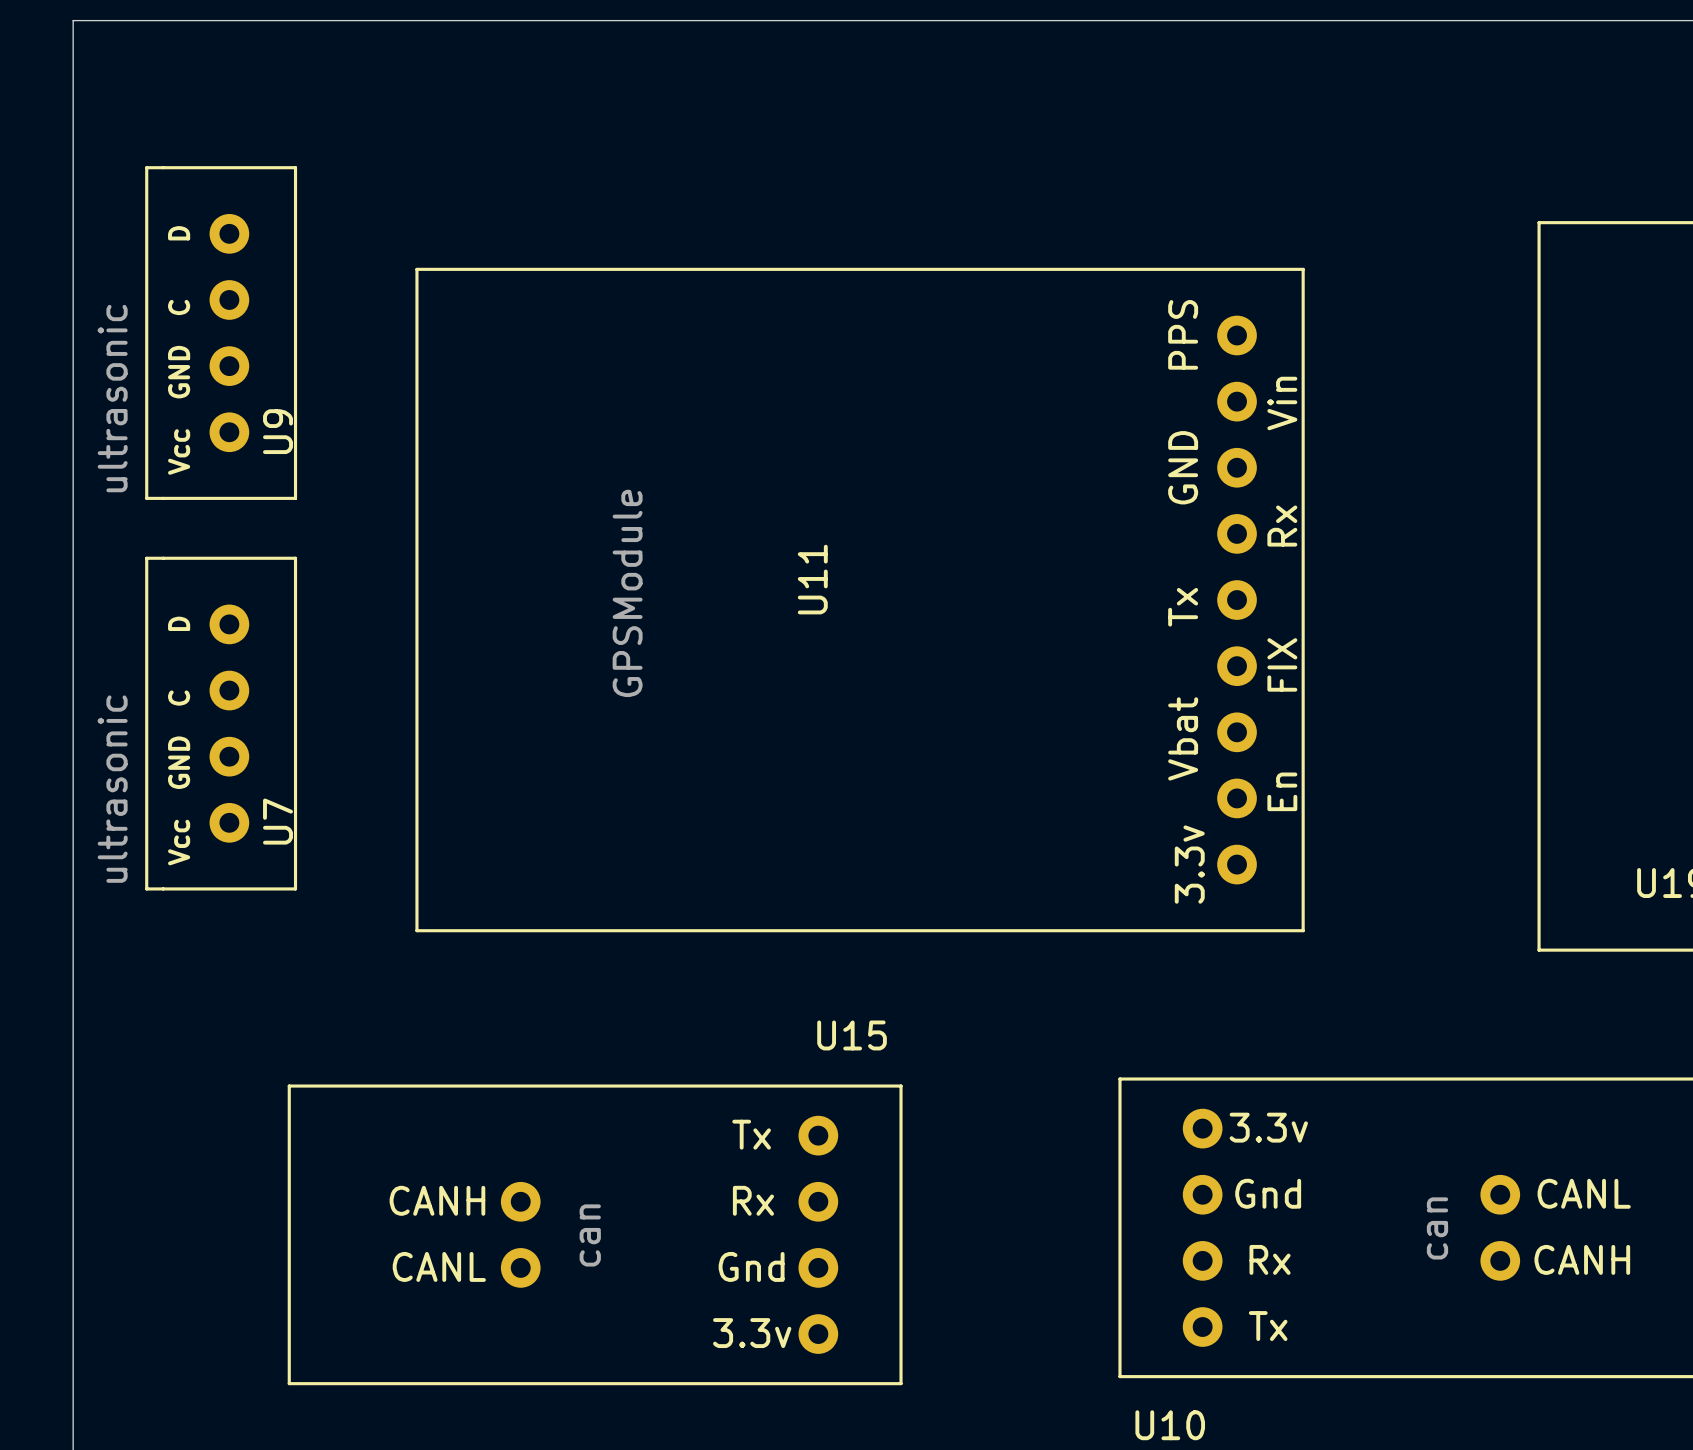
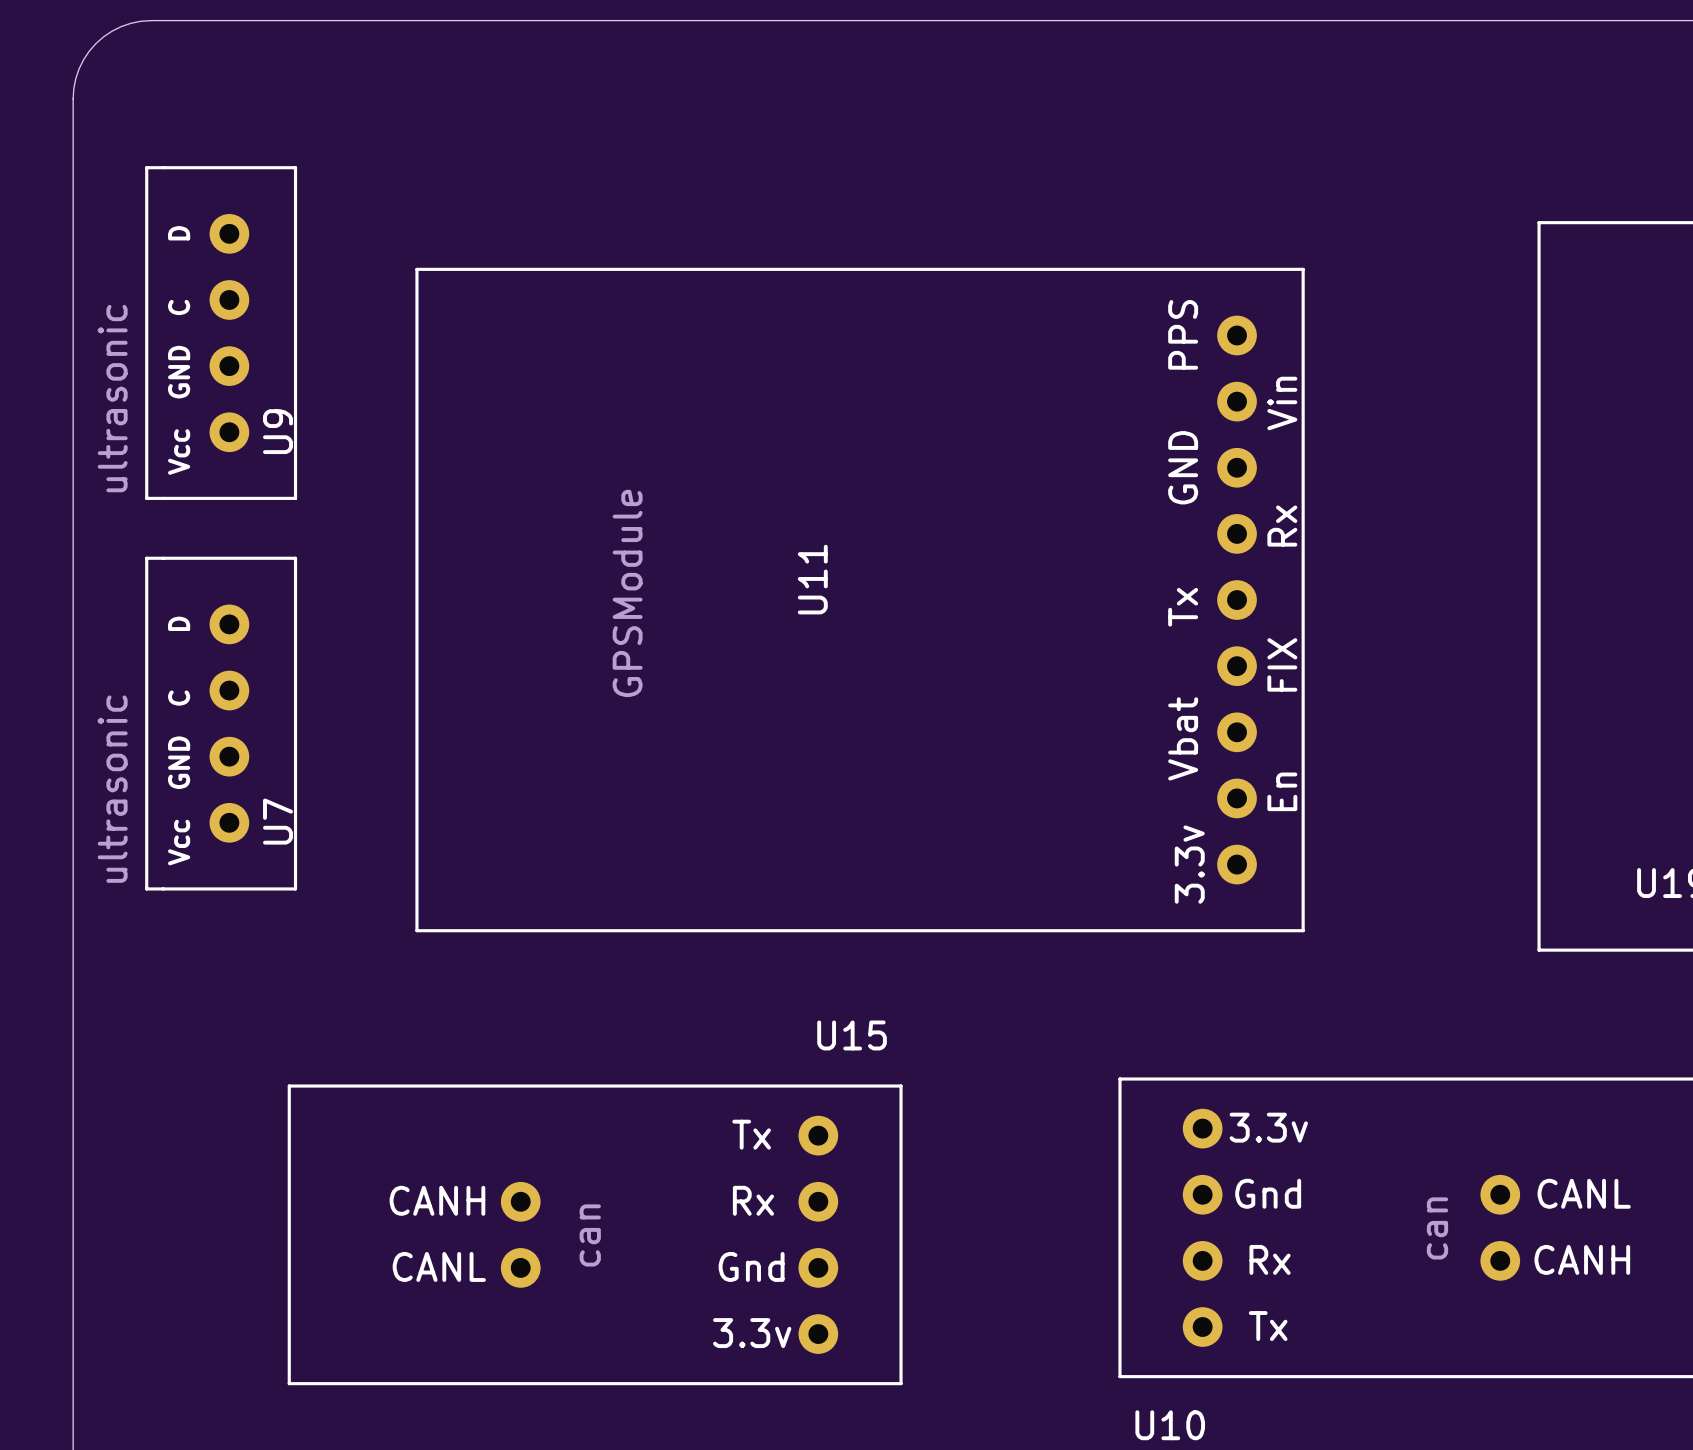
board edge: (151, 20) (73, 20) (73, 98) -> (151, 20) (121, 26) (96, 43) (79, 68) (73, 98)

